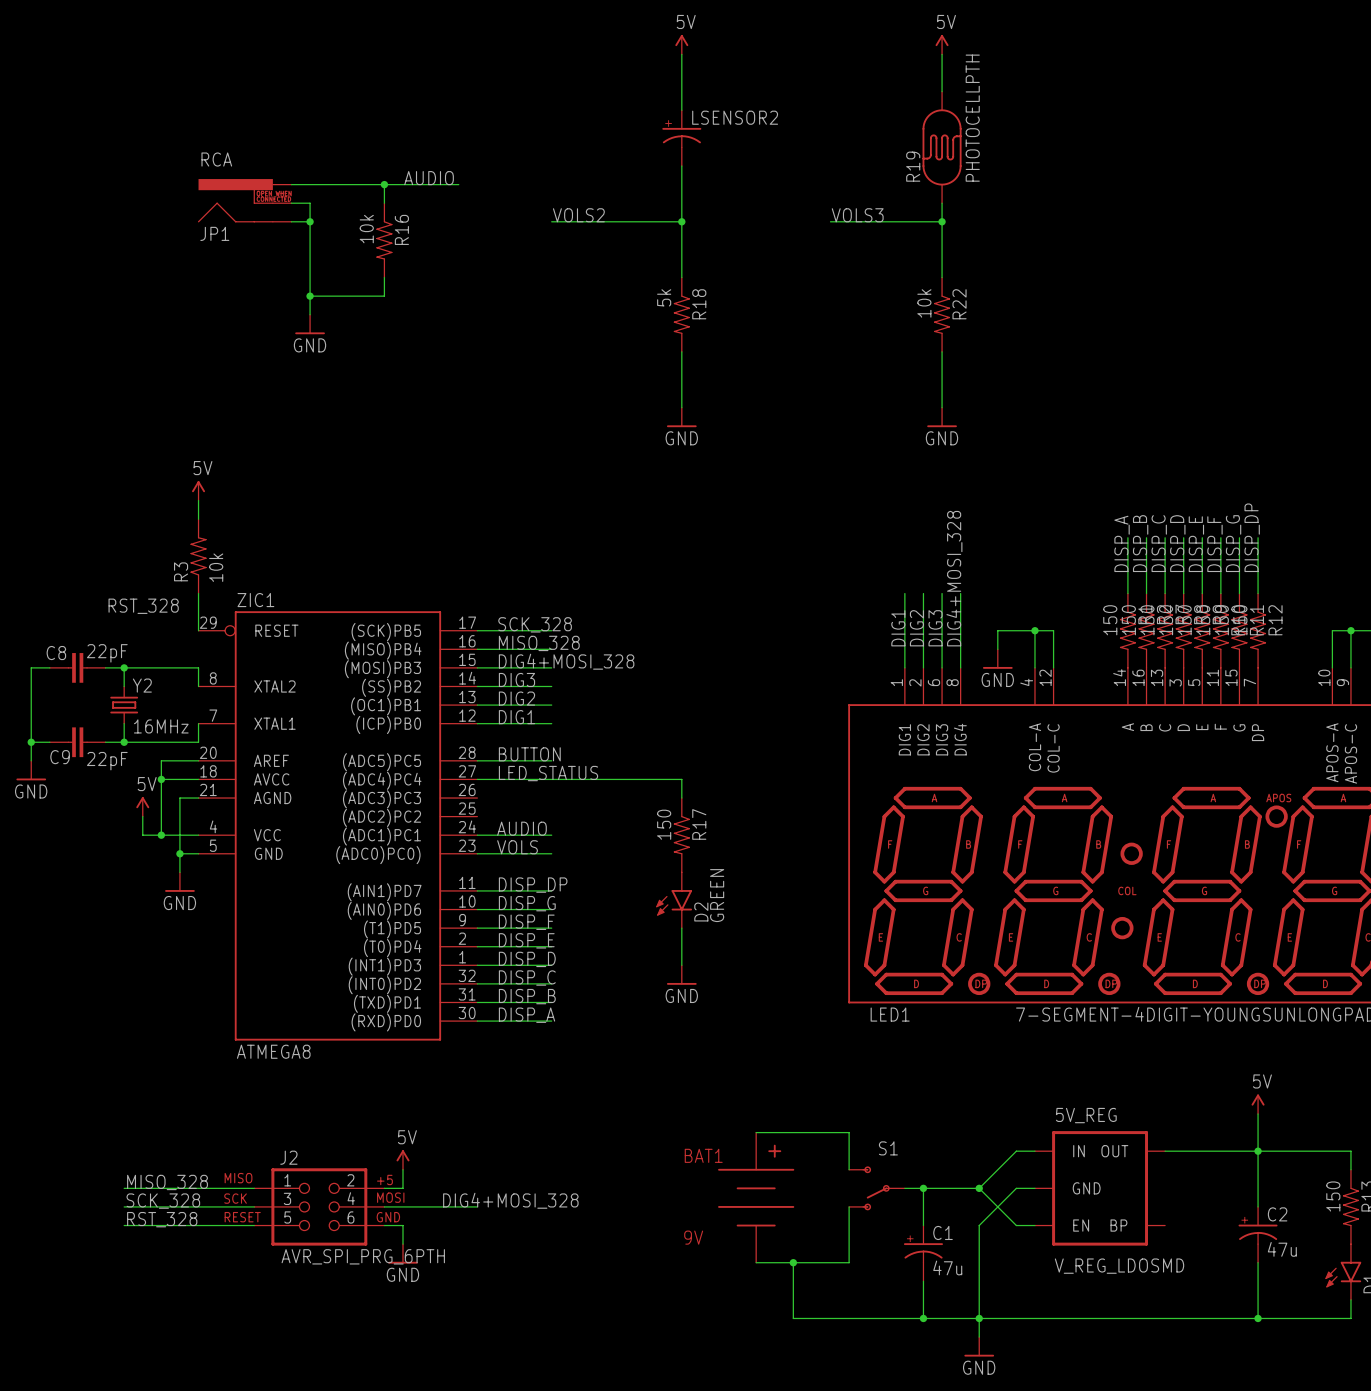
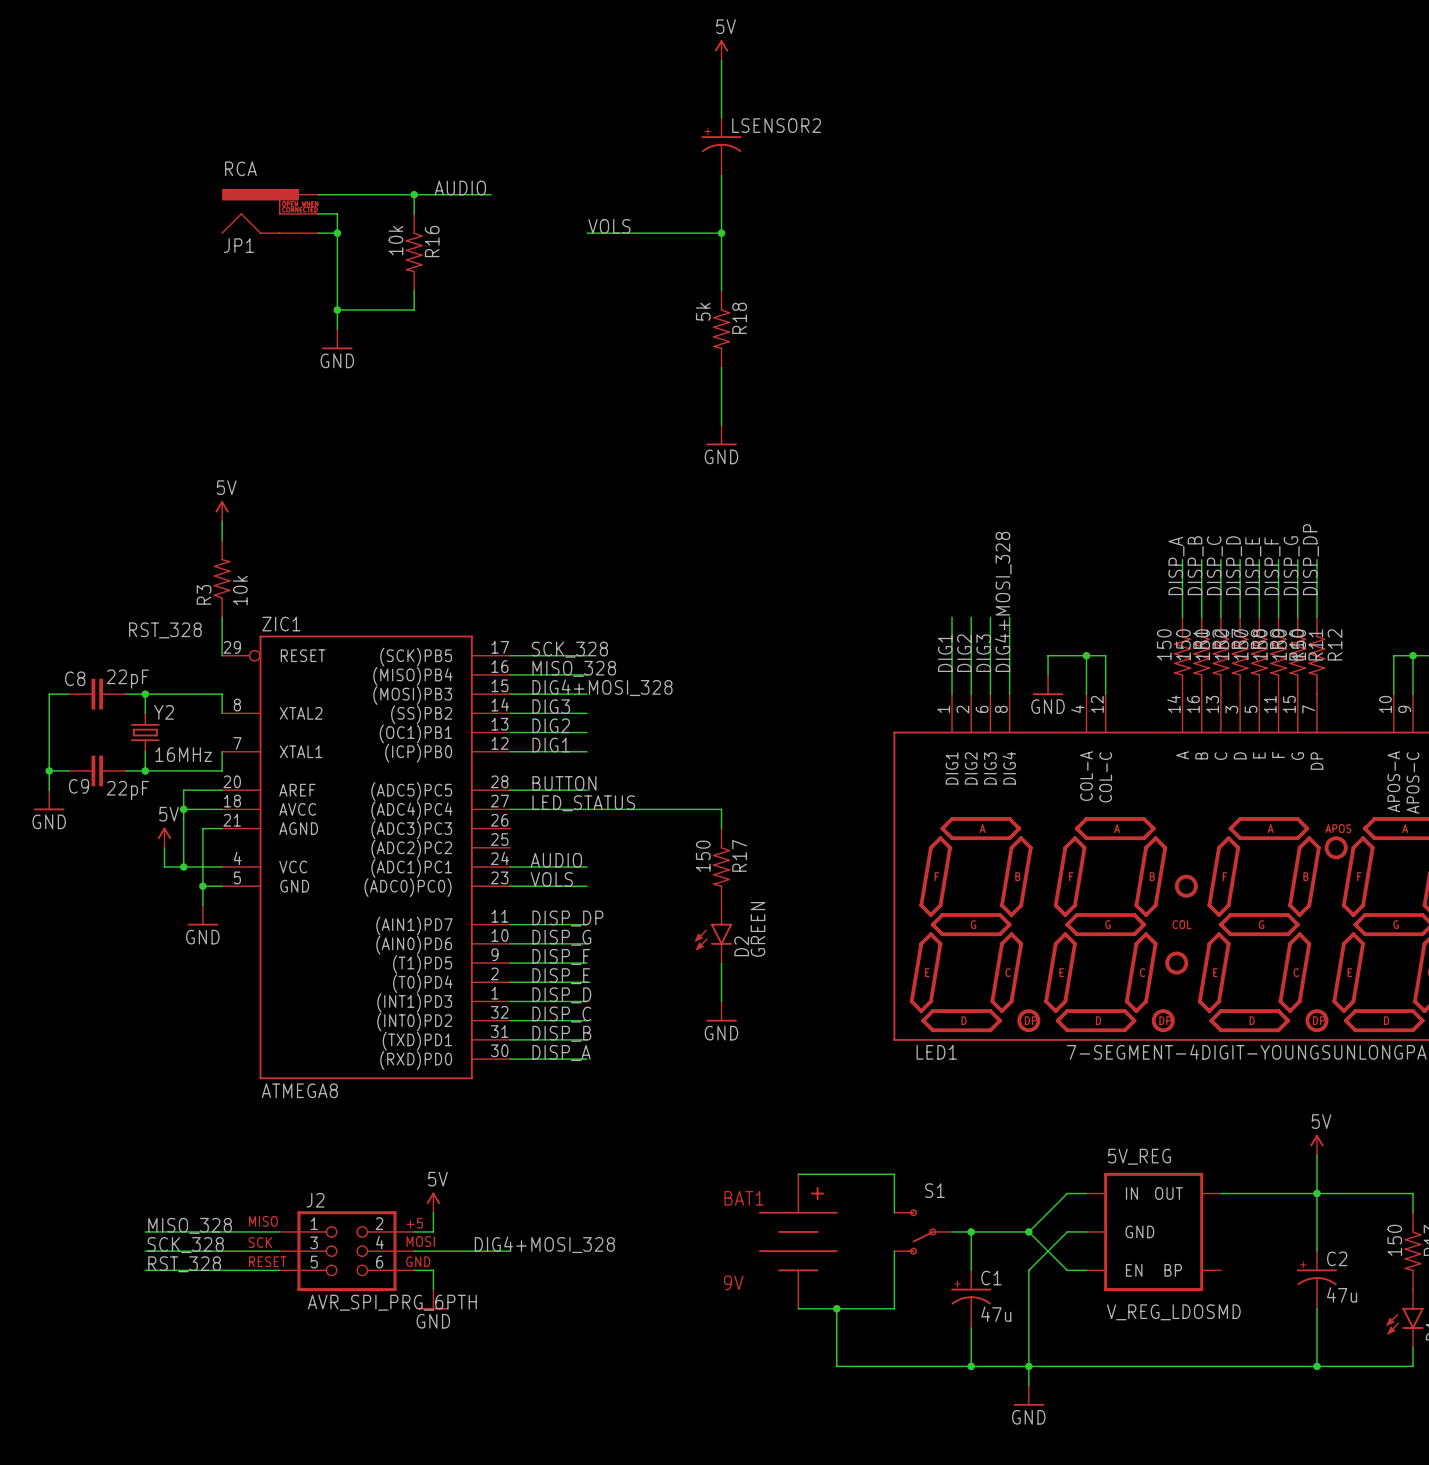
power symbol: 5V (942, 44) -> none
wire: (942, 54) (942, 91) -> none
R19: PHOTOCELLPTH (942, 147) -> none
wire: (942, 203) (942, 277) -> none
label: VOLS2 (578, 215) -> VOLS (609, 226)
label: VOLS3 (857, 215) -> none
wire: (830, 221) (942, 221) -> none
junction: (942, 221) -> none
R22: 10k (942, 314) -> none
wire: (942, 351) (942, 407) -> none
power symbol: GND (942, 417) -> none

